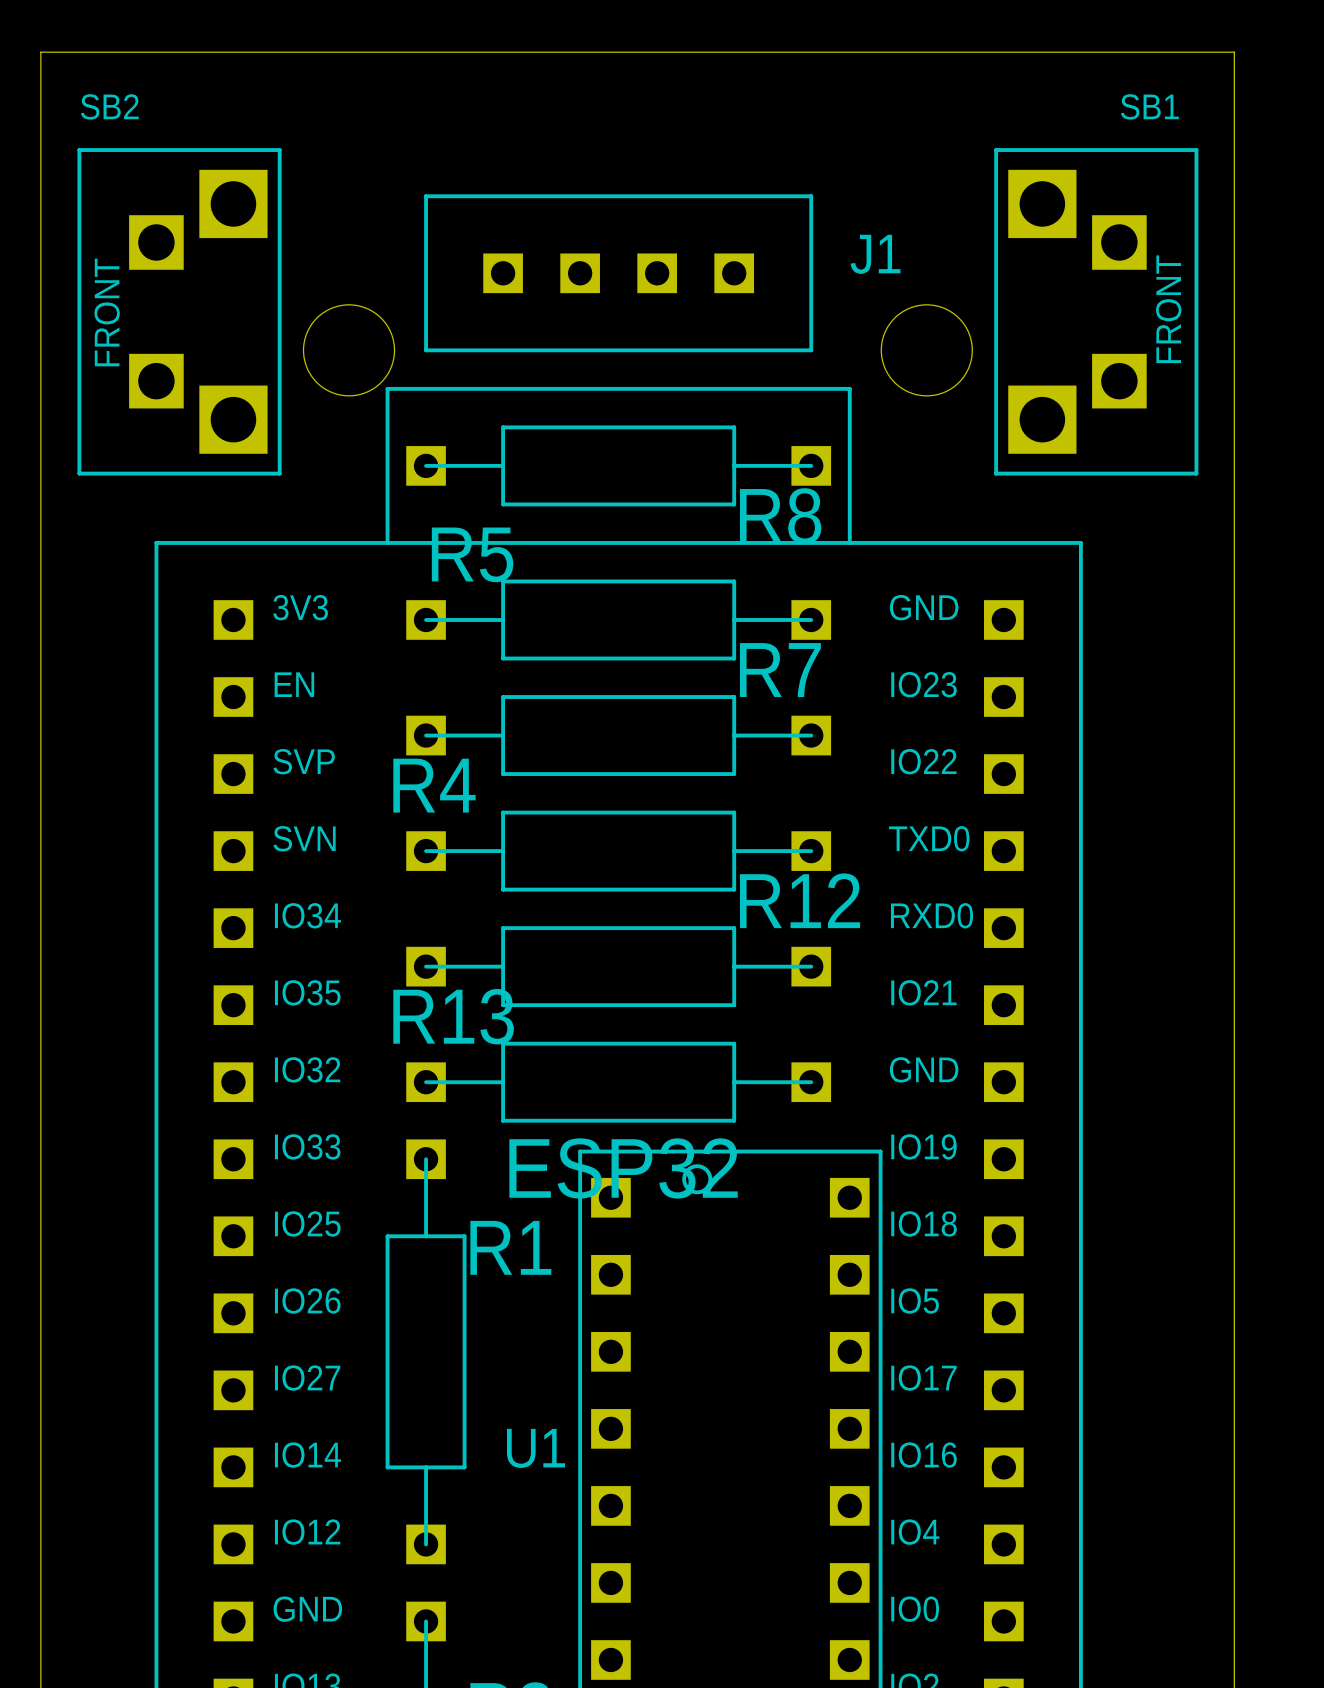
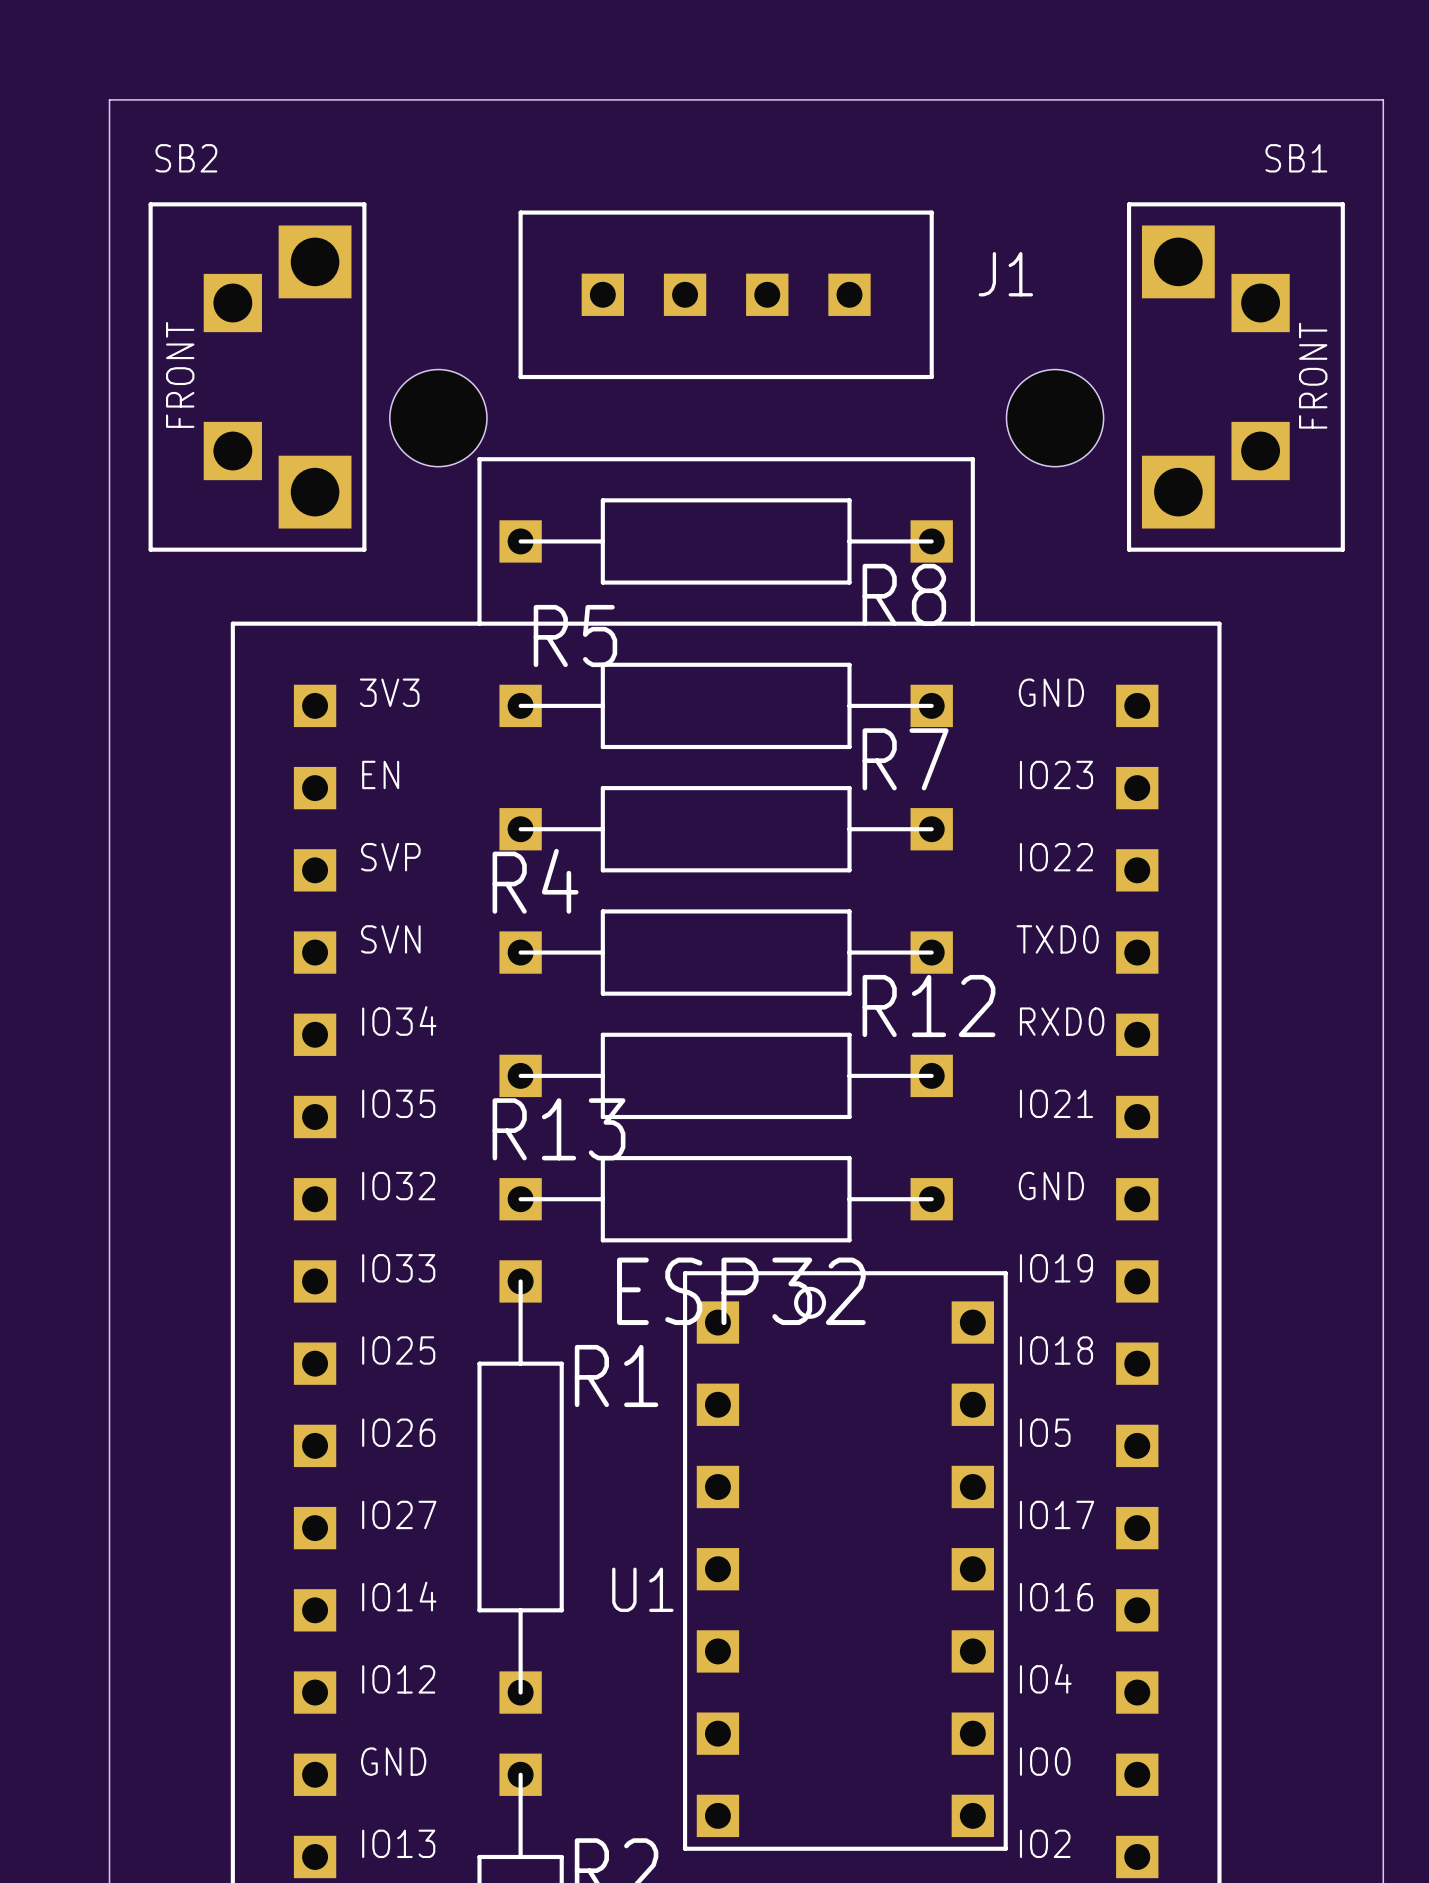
J1 position: (618, 273) -> (726, 294)

